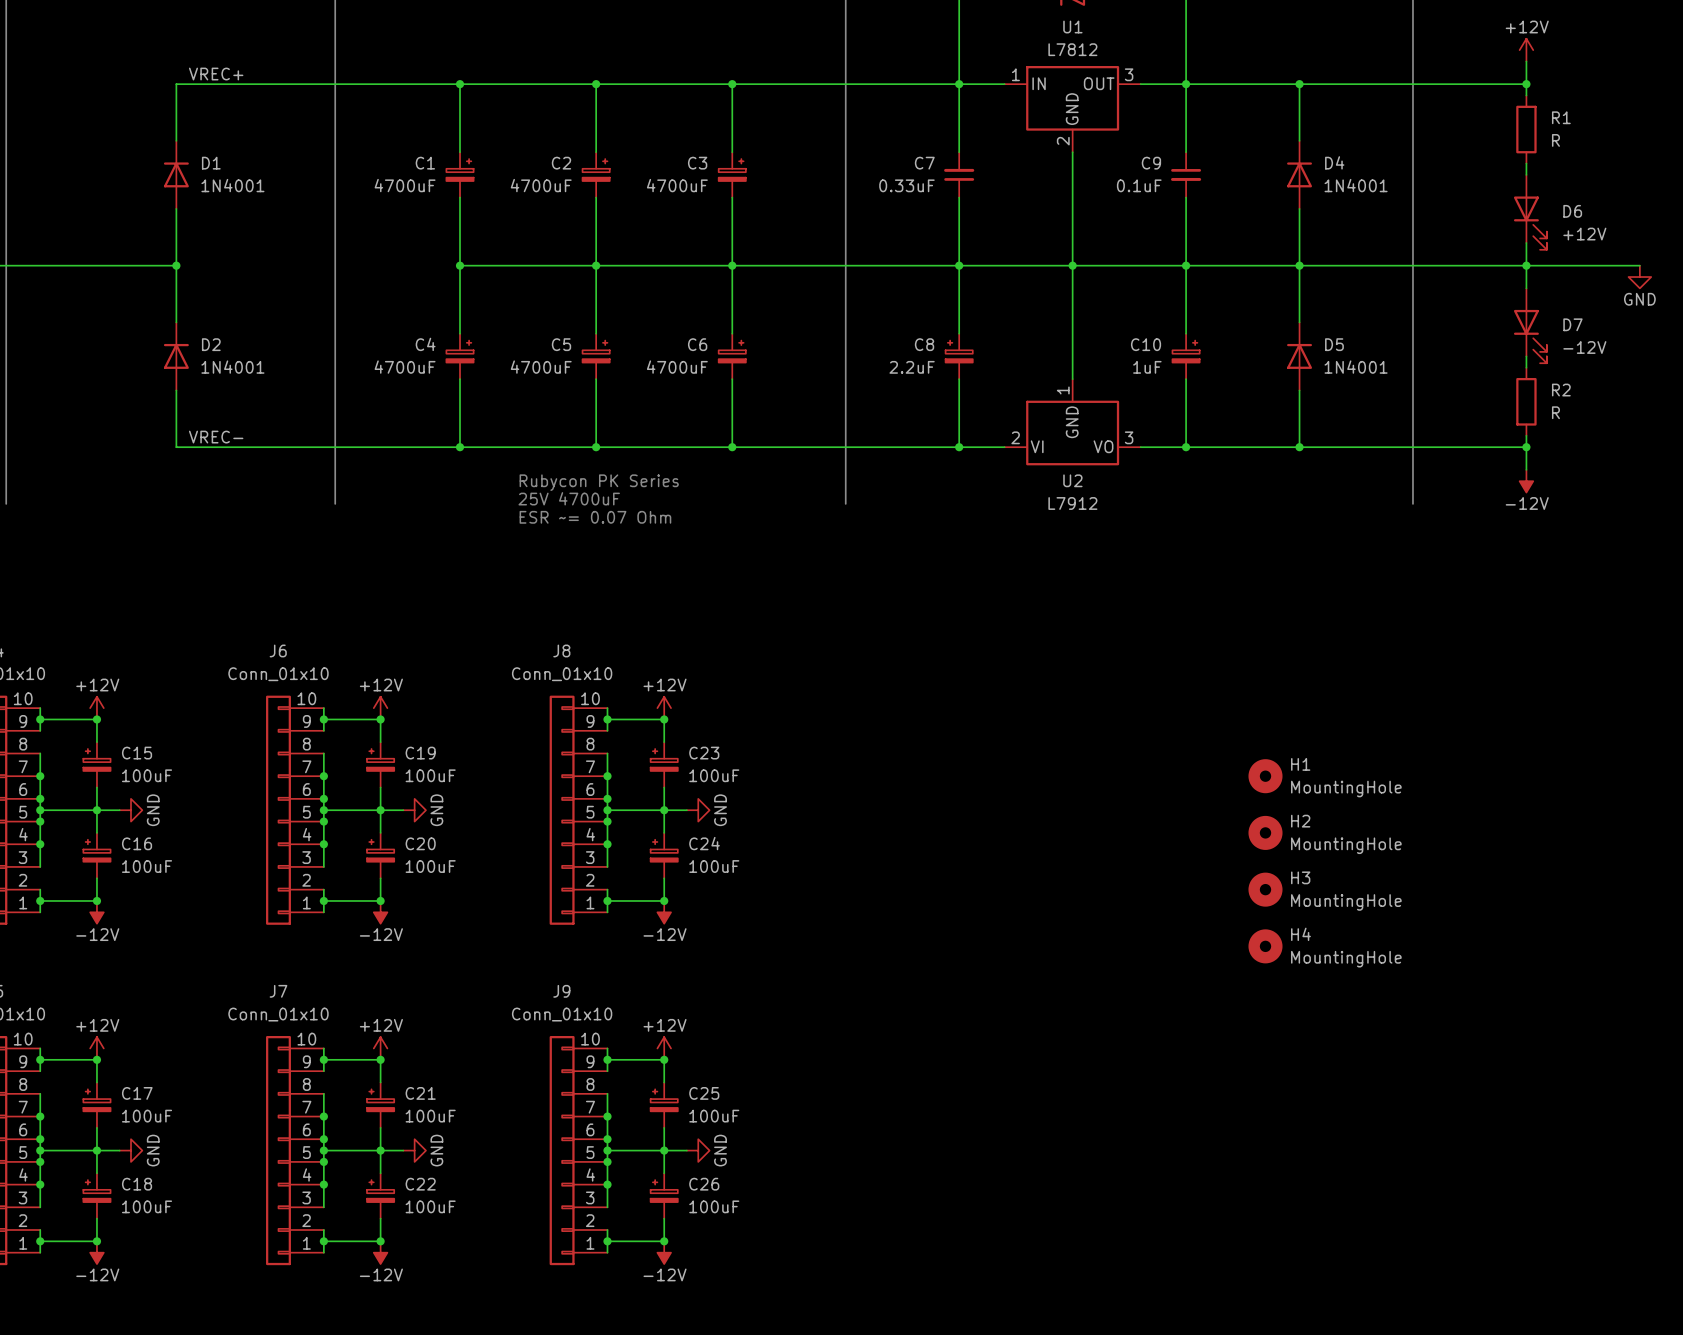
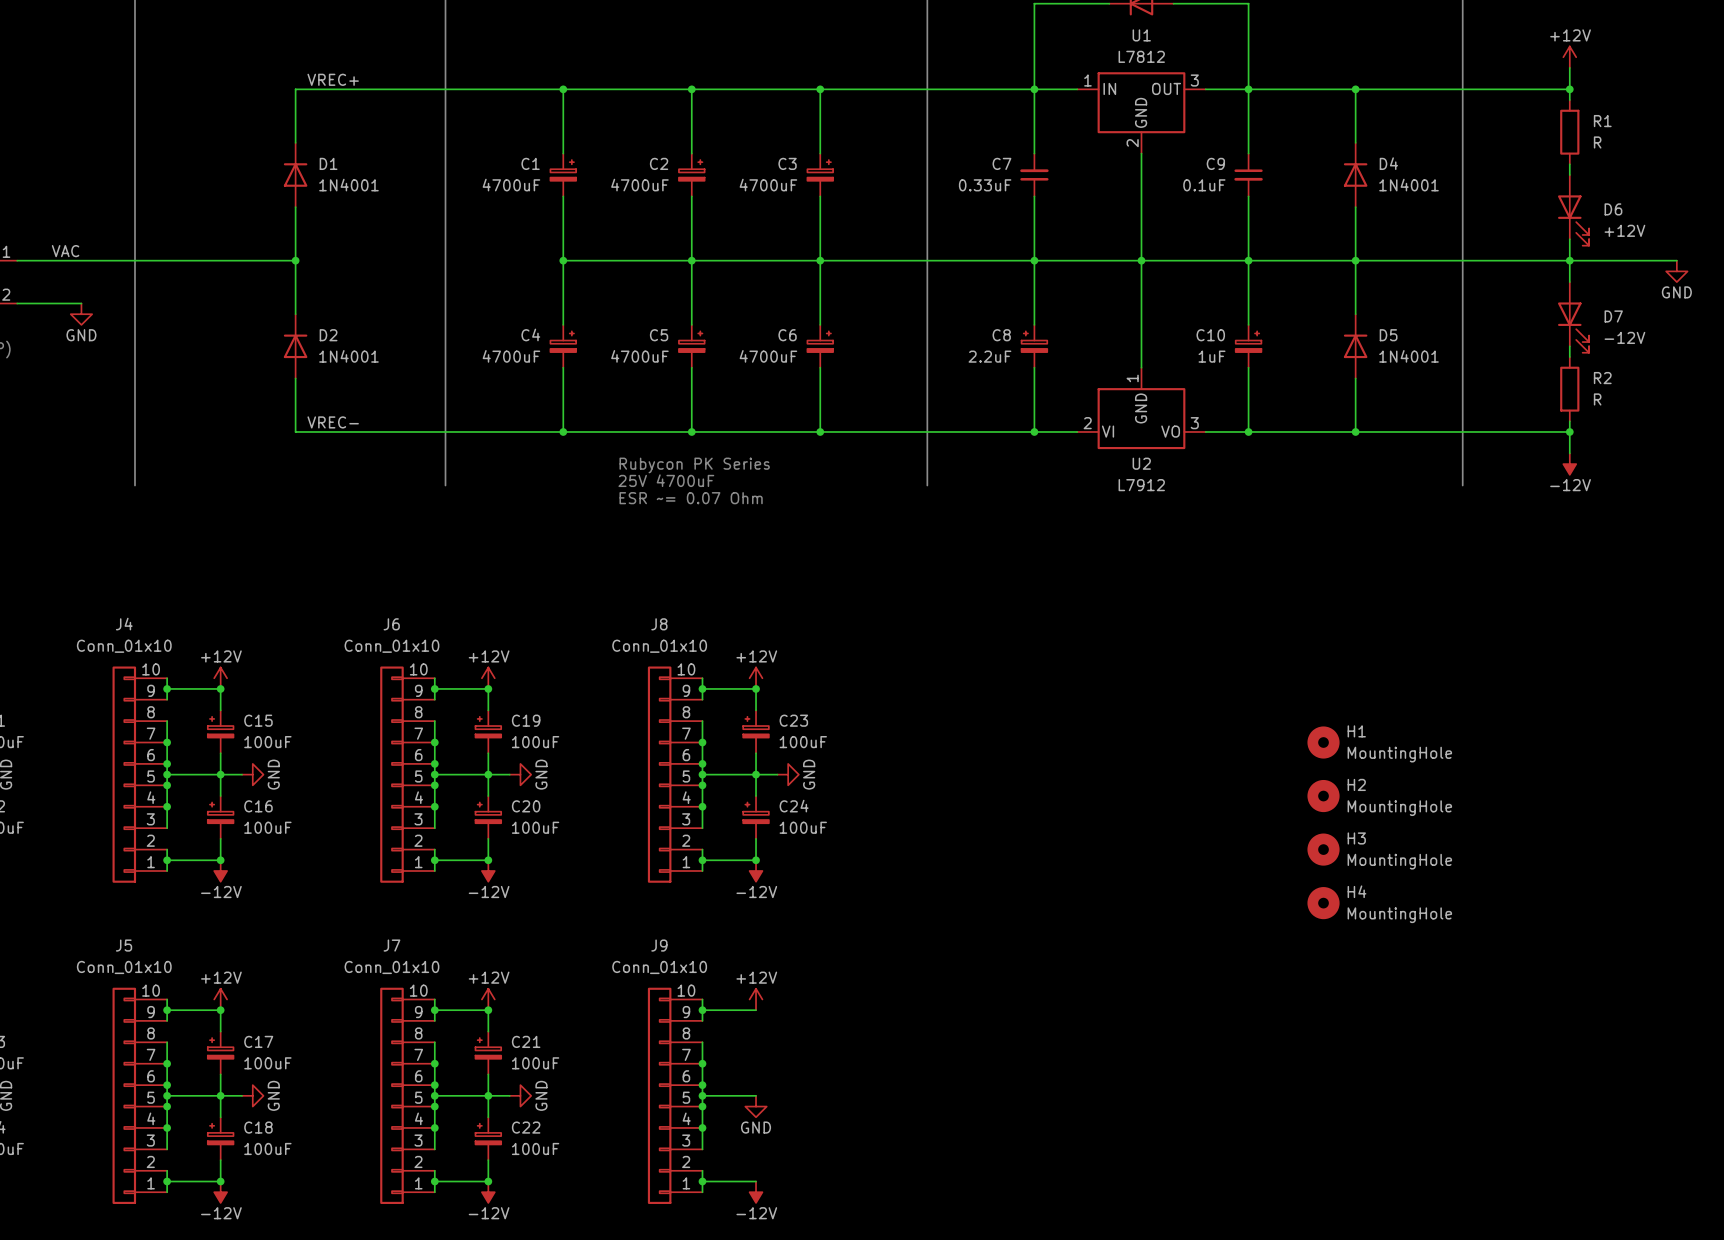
wire: (664, 1059) (664, 1082) -> none
junction: (664, 1059) -> none
C25: 100uF (664, 1105) -> none
wire: (664, 1127) (664, 1173) -> none
wire: (664, 1150) (686, 1150) -> none
junction: (664, 1150) -> none
power symbol rotation: 0° (698, 1150) -> 90° clockwise (756, 1106)
power symbol position: GND (698, 1150) -> GND (756, 1106)
C26: 100uF (664, 1195) -> none
wire: (664, 1218) (664, 1241) -> none
junction: (664, 1241) -> none

